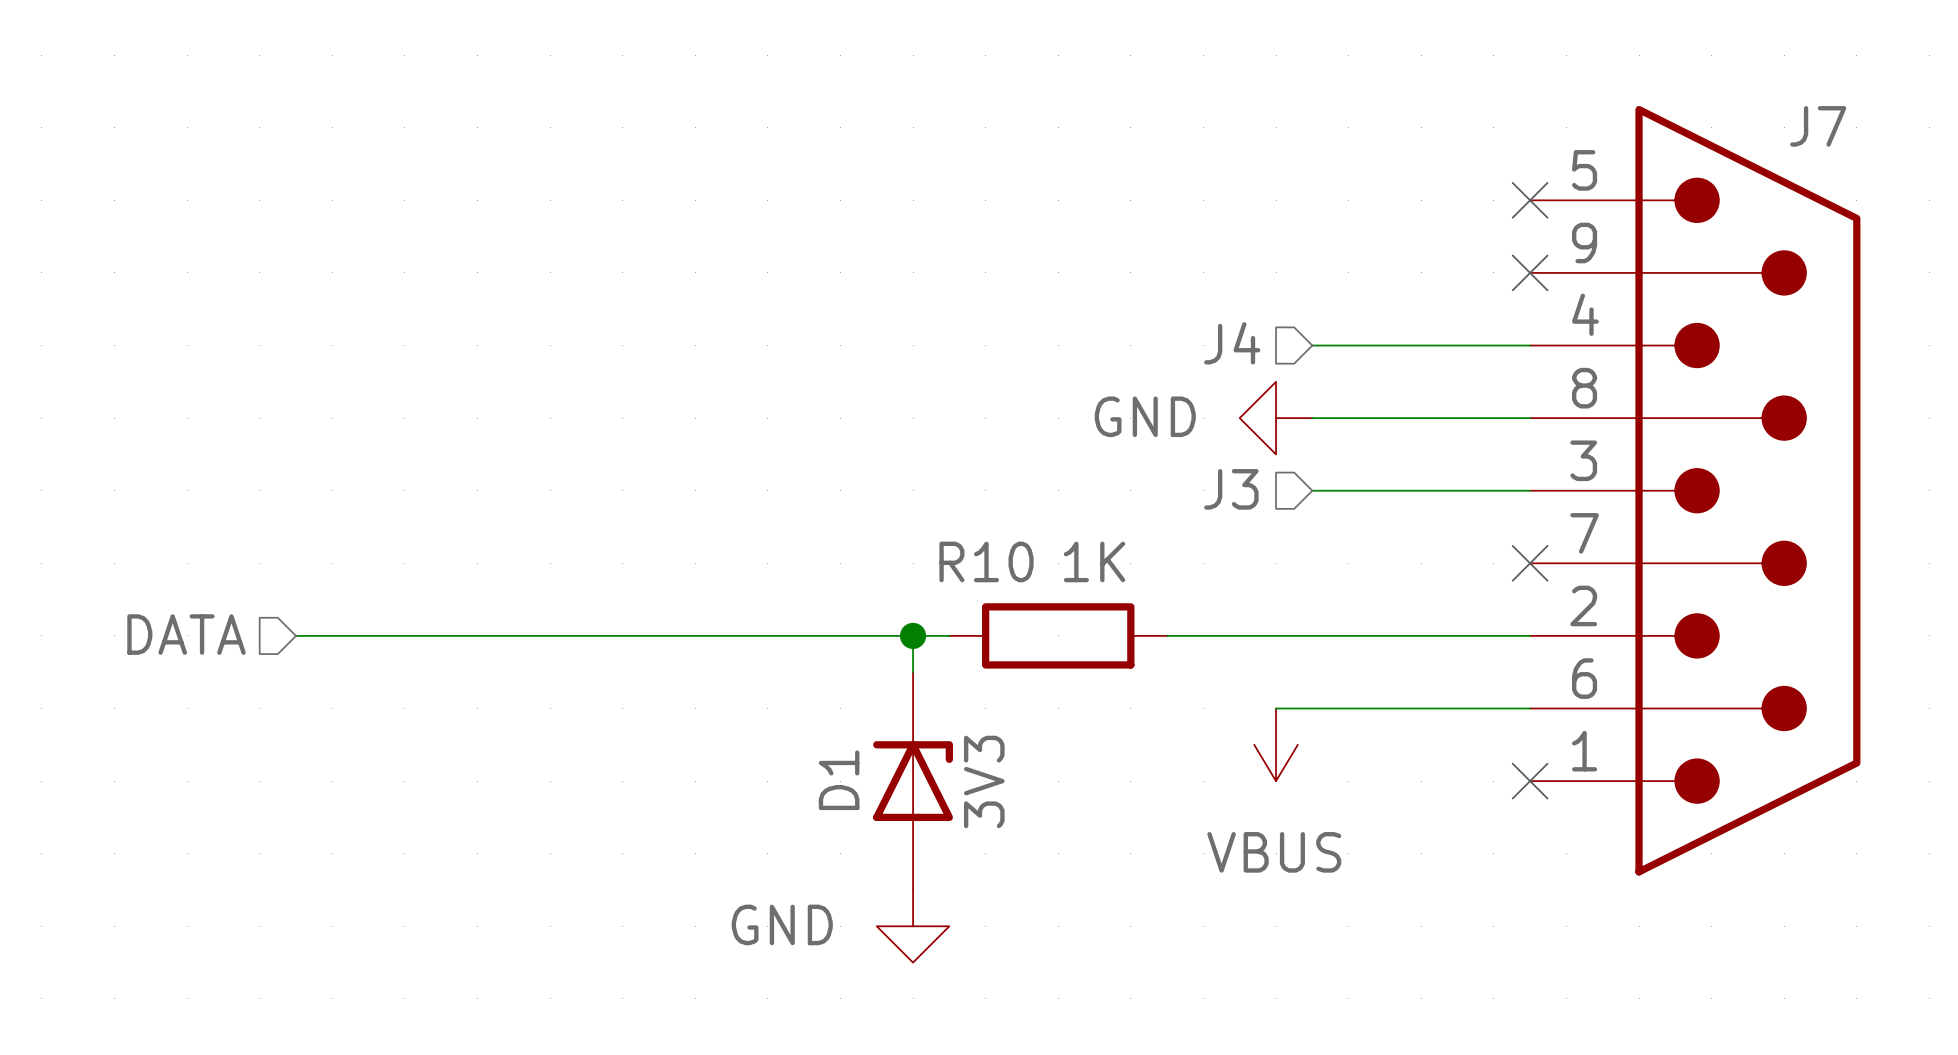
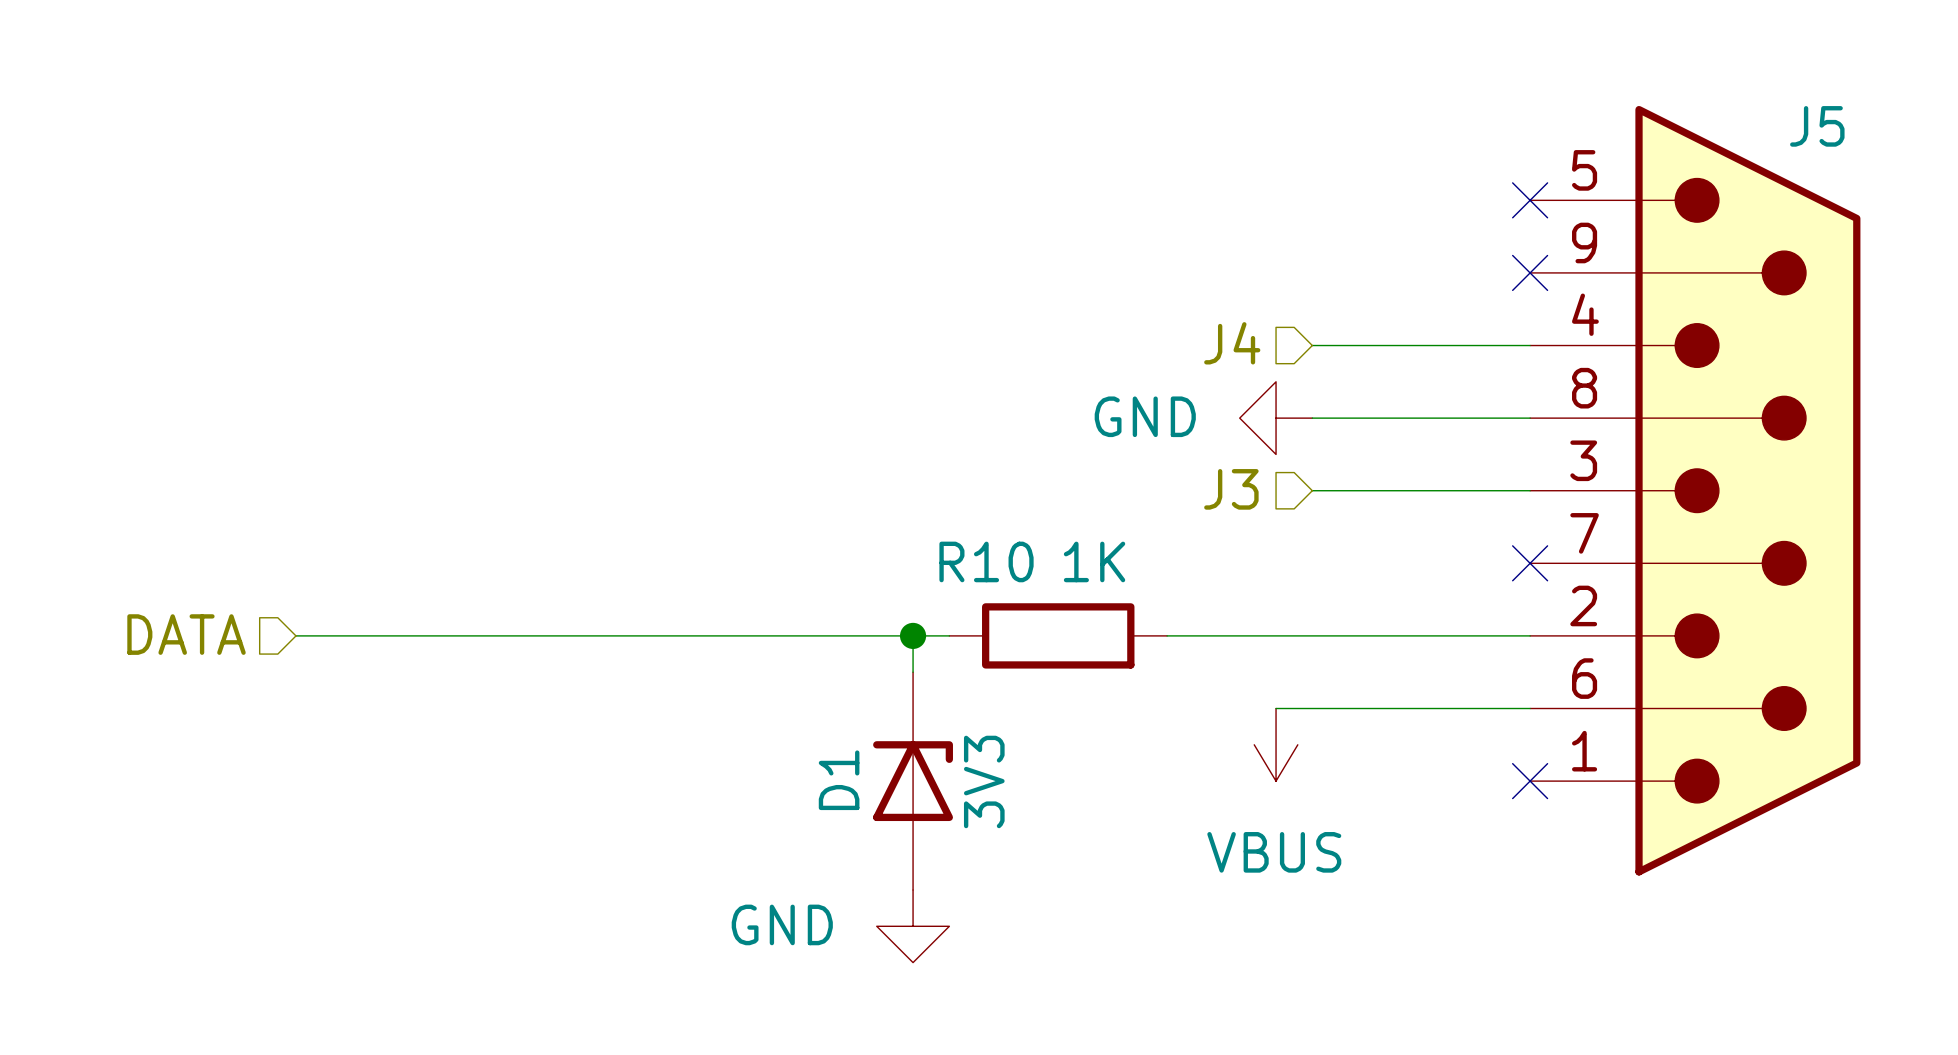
J7 name: J7 (1818, 126) -> J5 (1817, 126)

